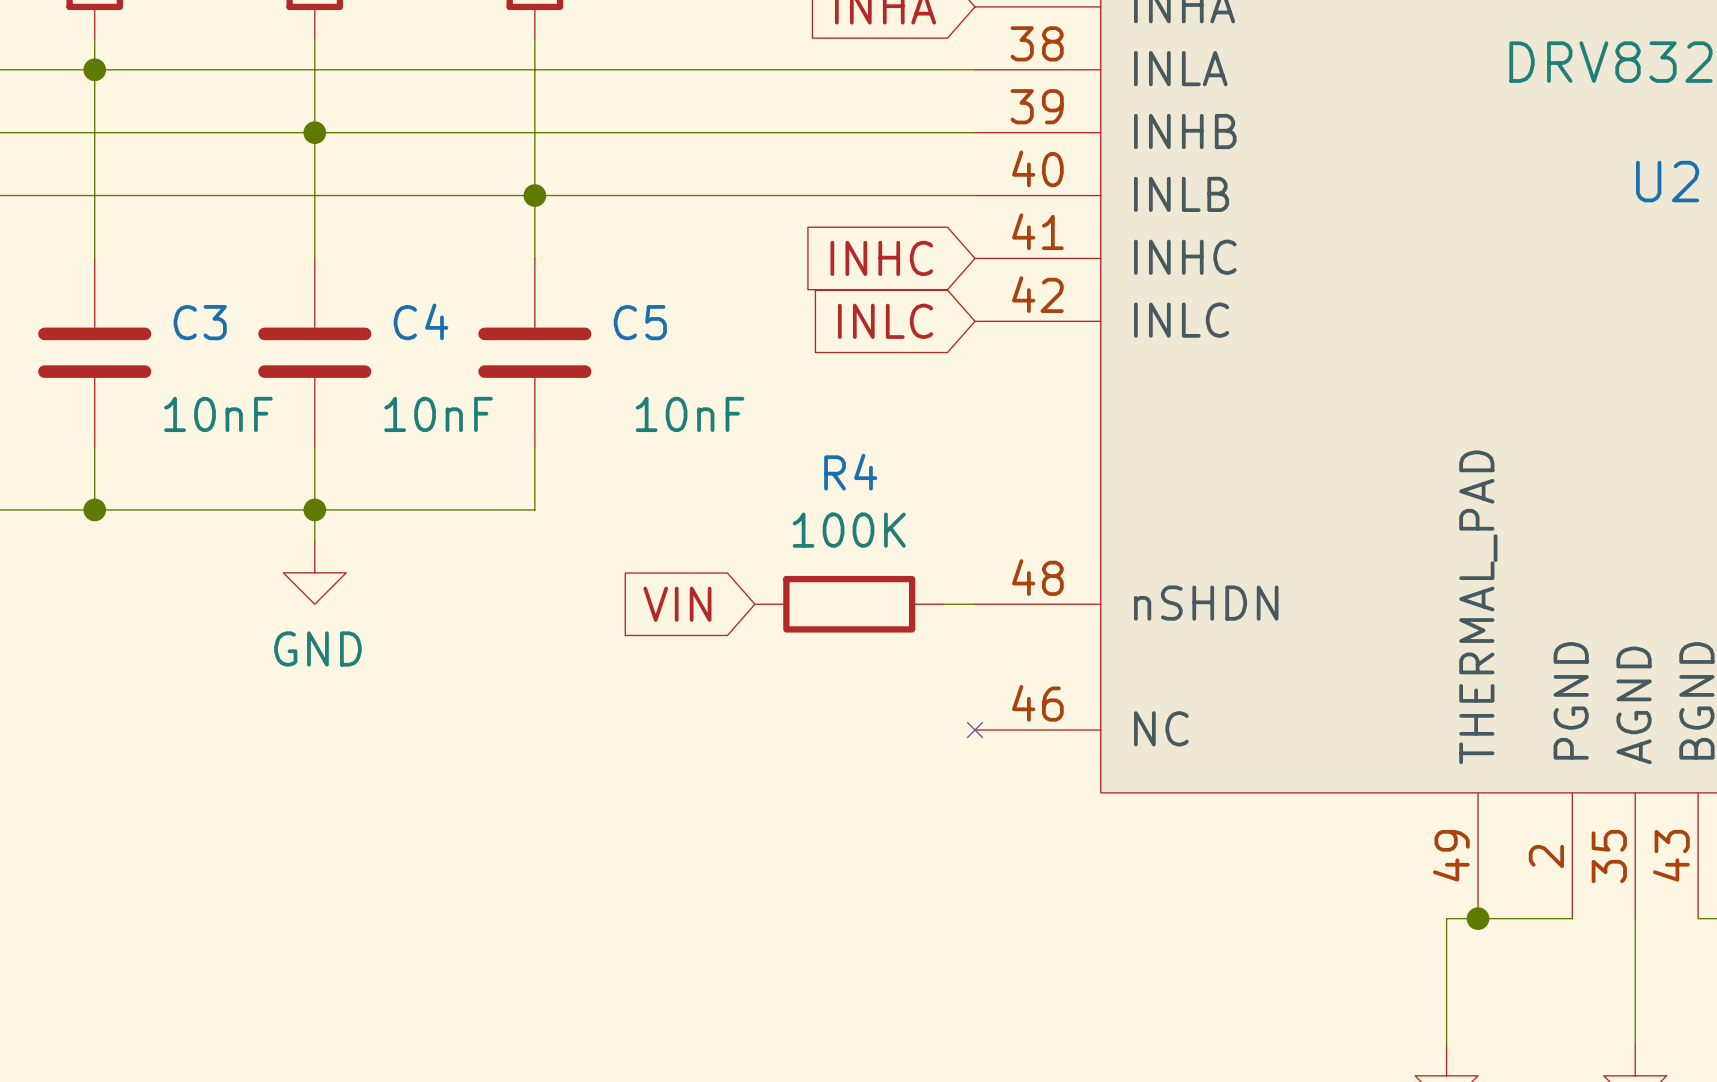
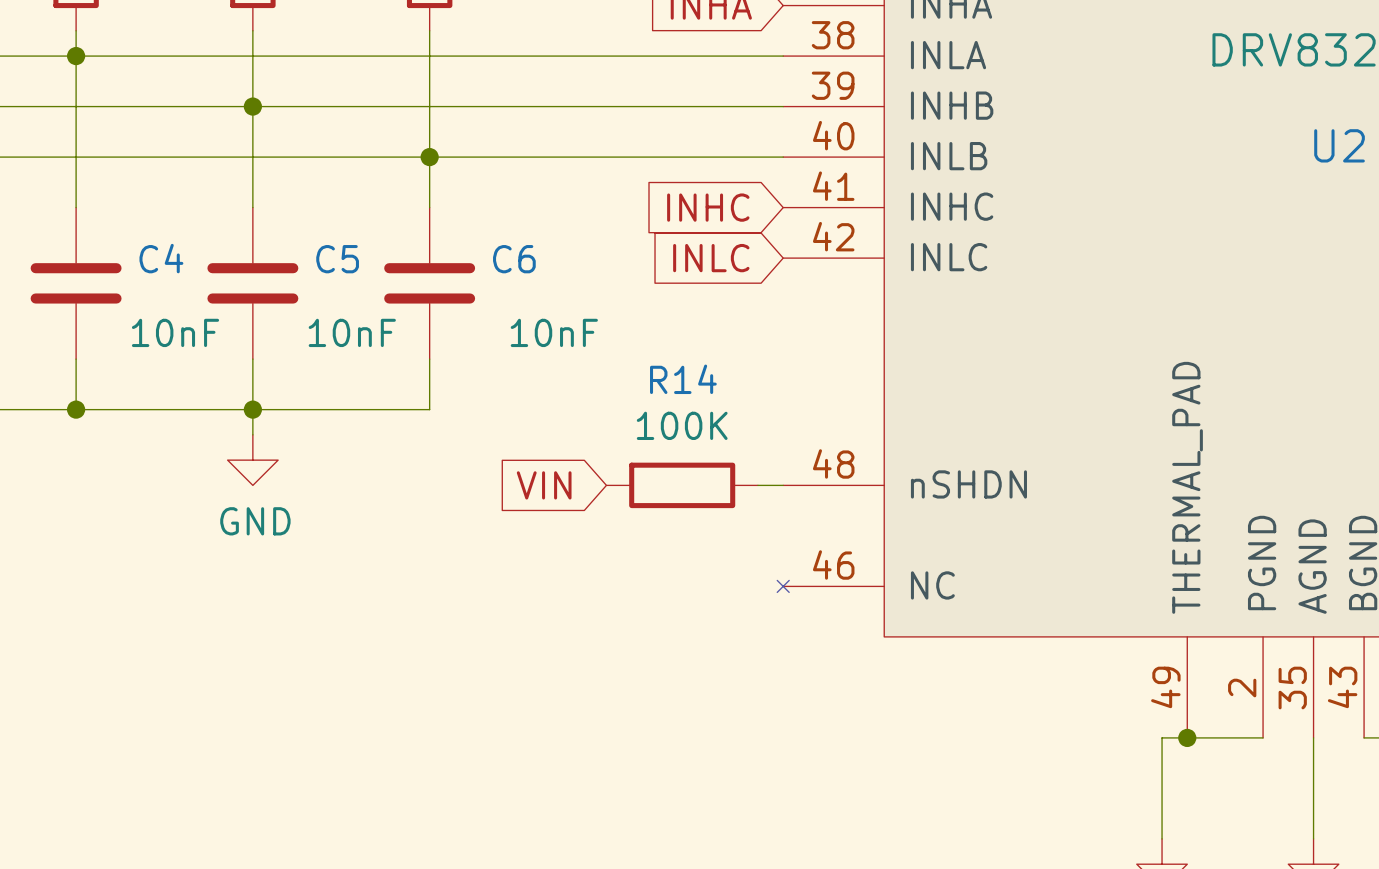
C4 name: C4 (421, 321) -> C5 (337, 259)
C3 name: C3 (200, 322) -> C4 (161, 258)
C5 name: C5 (640, 322) -> C6 (514, 259)
R4 name: R4 (850, 472) -> R14 (683, 379)

